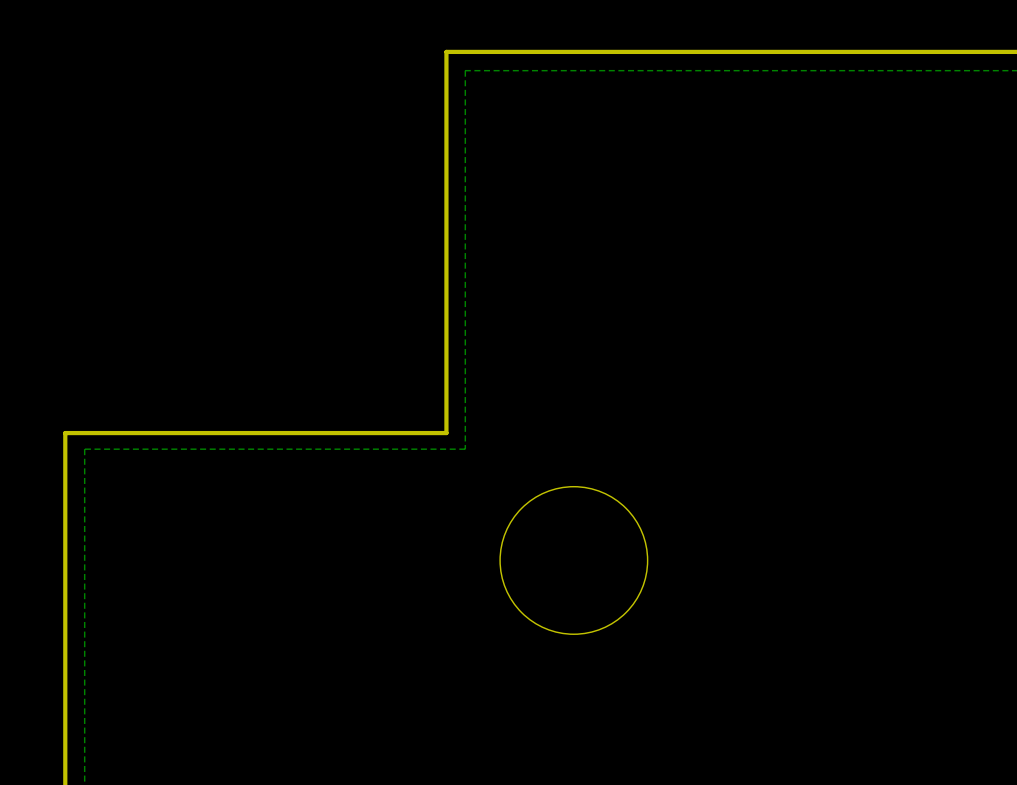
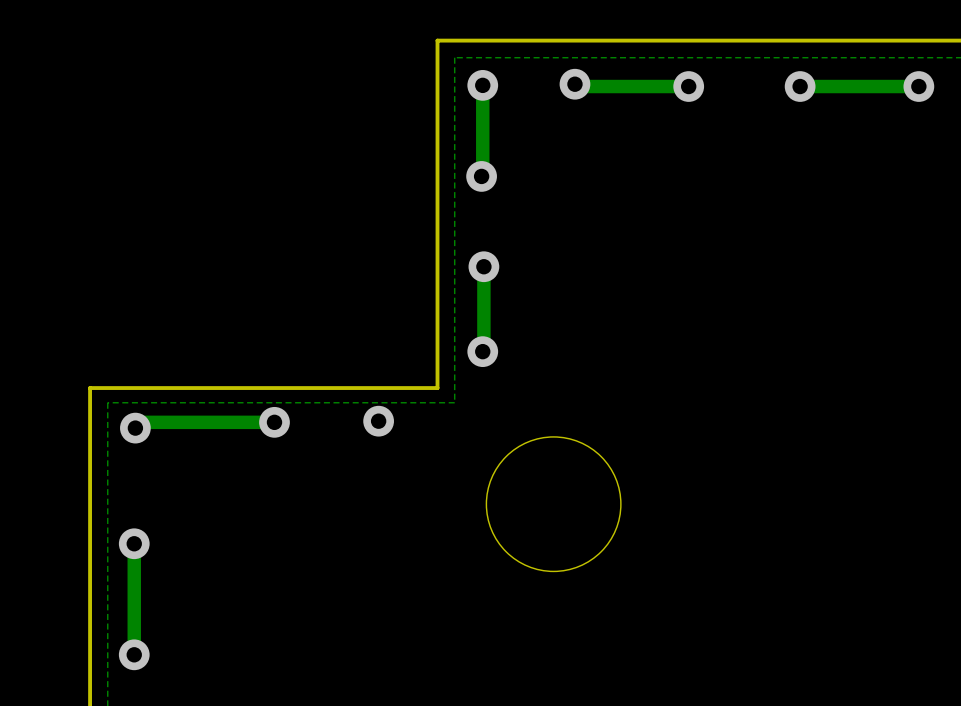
track: none -> (574, 84) (577, 86) (688, 86)
via: none -> (574, 84)
track: none -> (482, 85) (481, 176)
via: none -> (482, 85)
via: none -> (688, 86)
via: none -> (800, 86)
track: none -> (918, 86) (800, 86)
via: none -> (918, 86)
via: none -> (481, 176)
track: none -> (483, 266) (482, 351)
via: none -> (483, 266)
via: none -> (482, 351)
via: none -> (378, 421)
track: none -> (274, 422) (141, 422) (135, 428)
via: none -> (274, 422)
via: none -> (135, 428)
track: none -> (134, 543) (134, 654)
via: none -> (134, 543)
via: none -> (134, 654)

